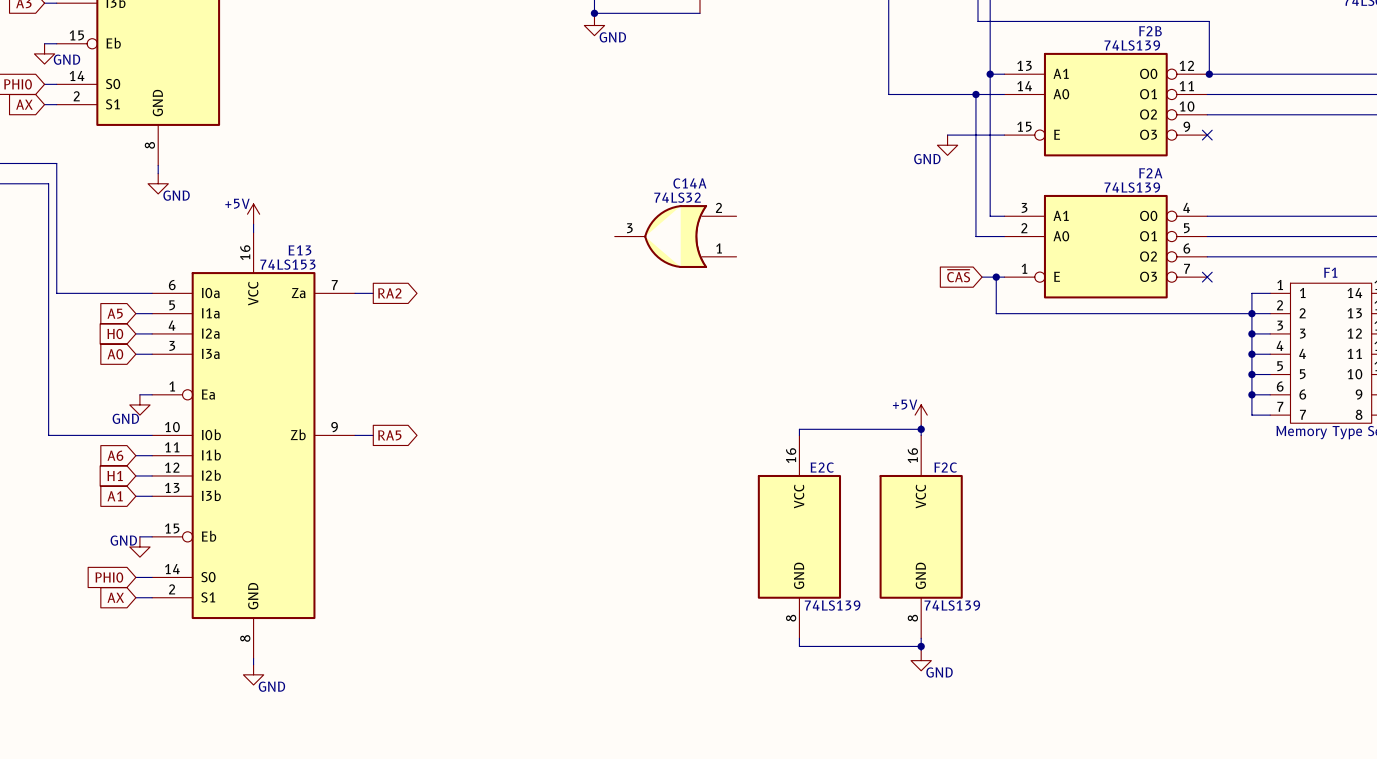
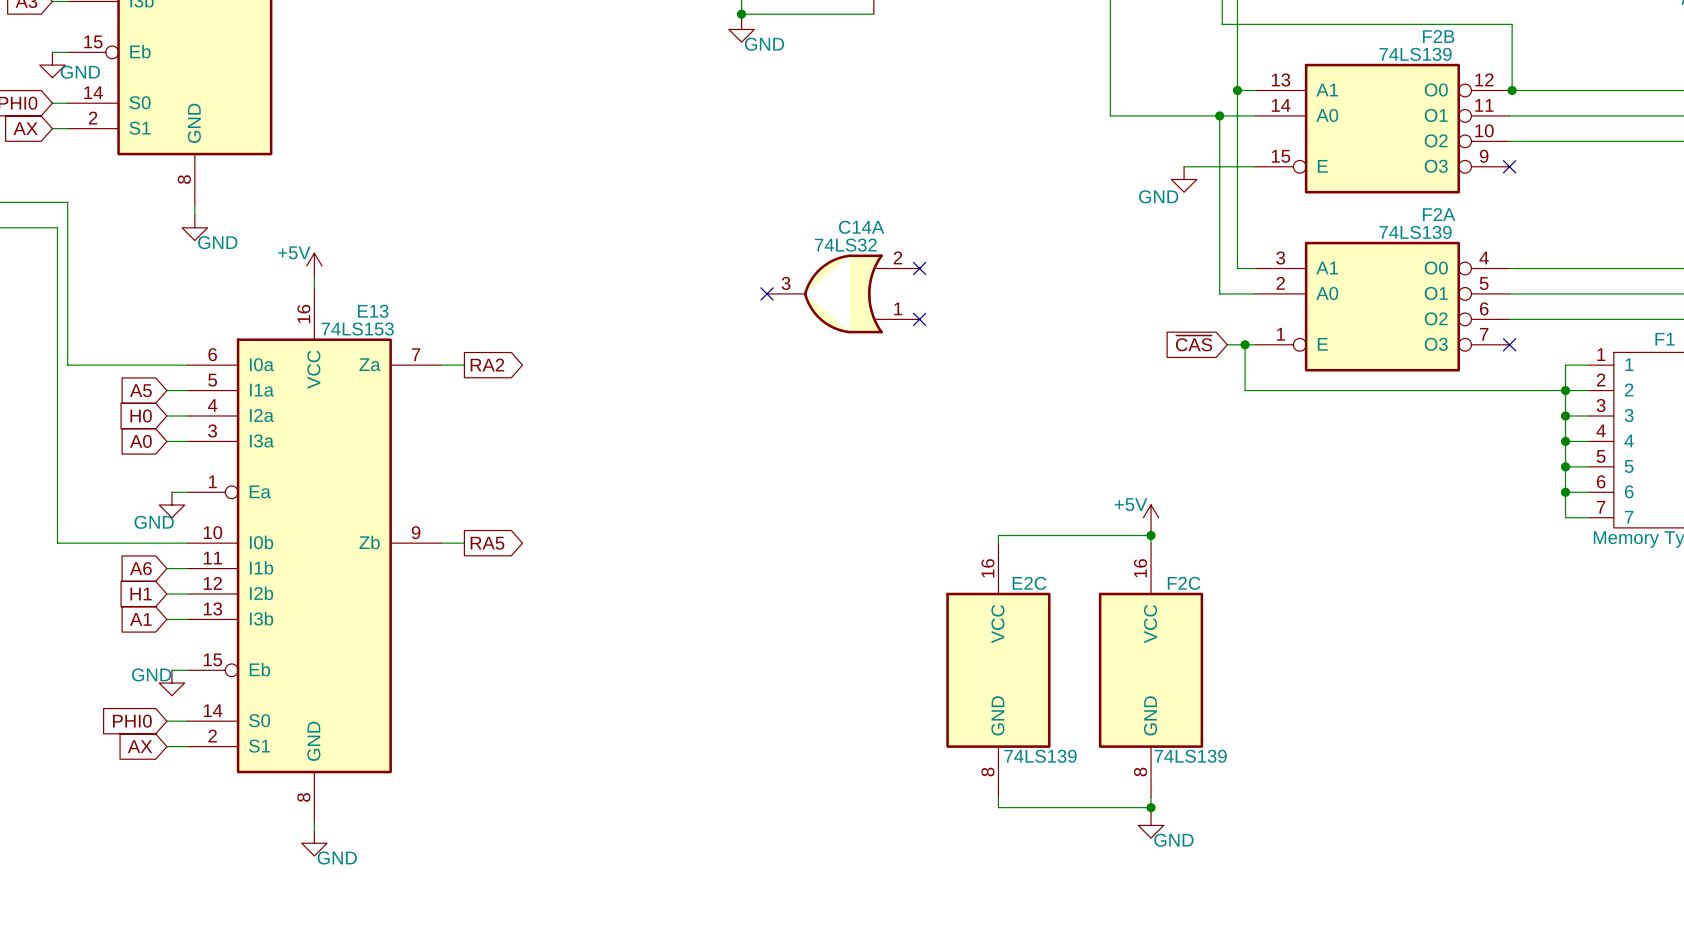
no-connect mark: none -> (919, 268)
no-connect mark: none -> (767, 293)
no-connect mark: none -> (919, 319)

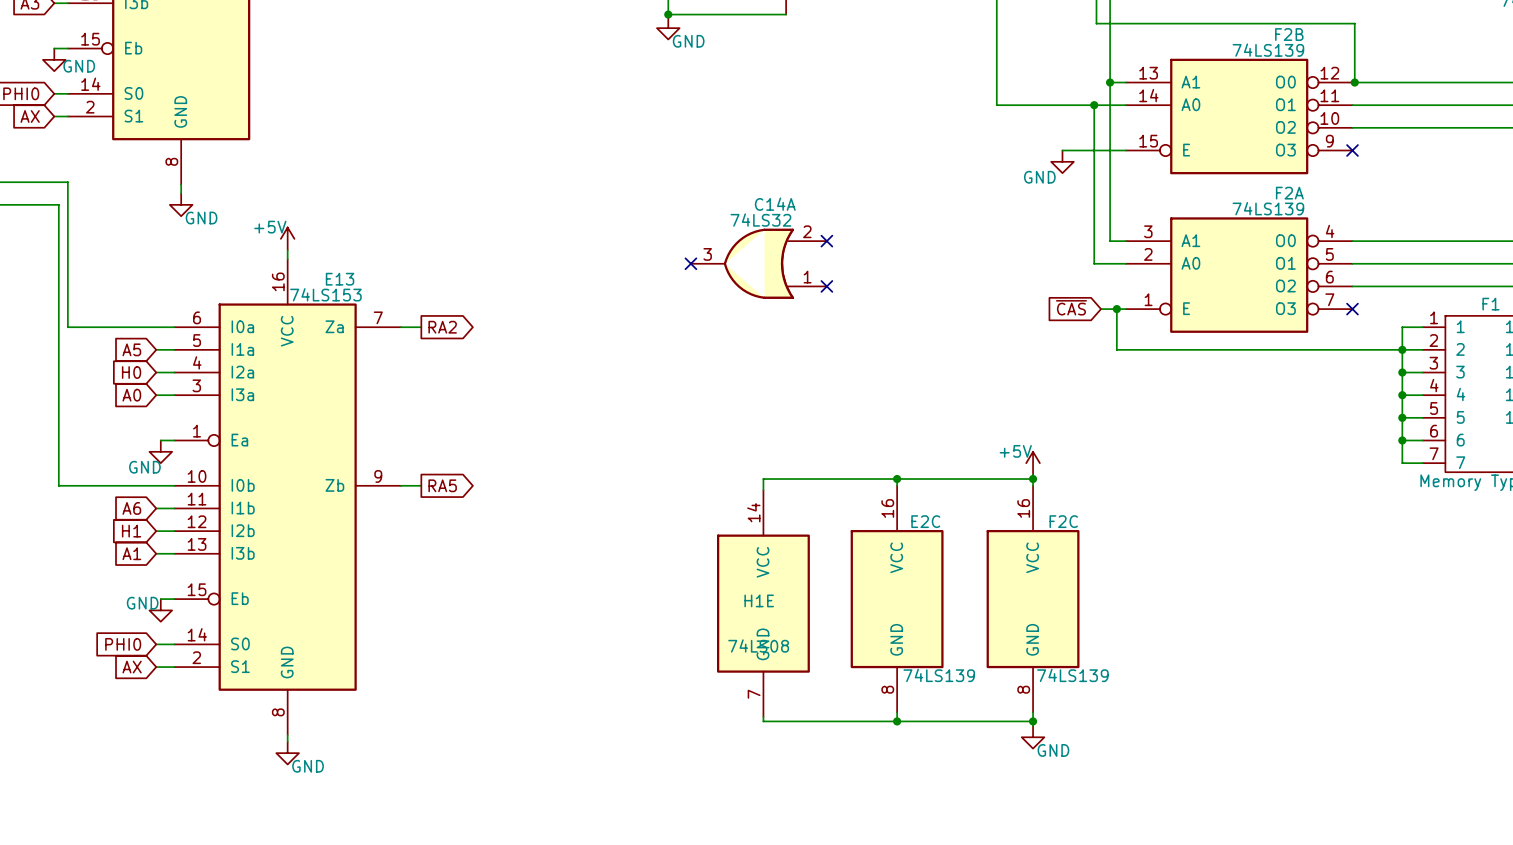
wire: none -> (897, 479) (763, 479) (763, 490)
junction: none -> (897, 479)
H1E: none -> 74LS08 (763, 603)
wire: none -> (763, 716) (763, 721) (897, 721)
junction: none -> (897, 721)

